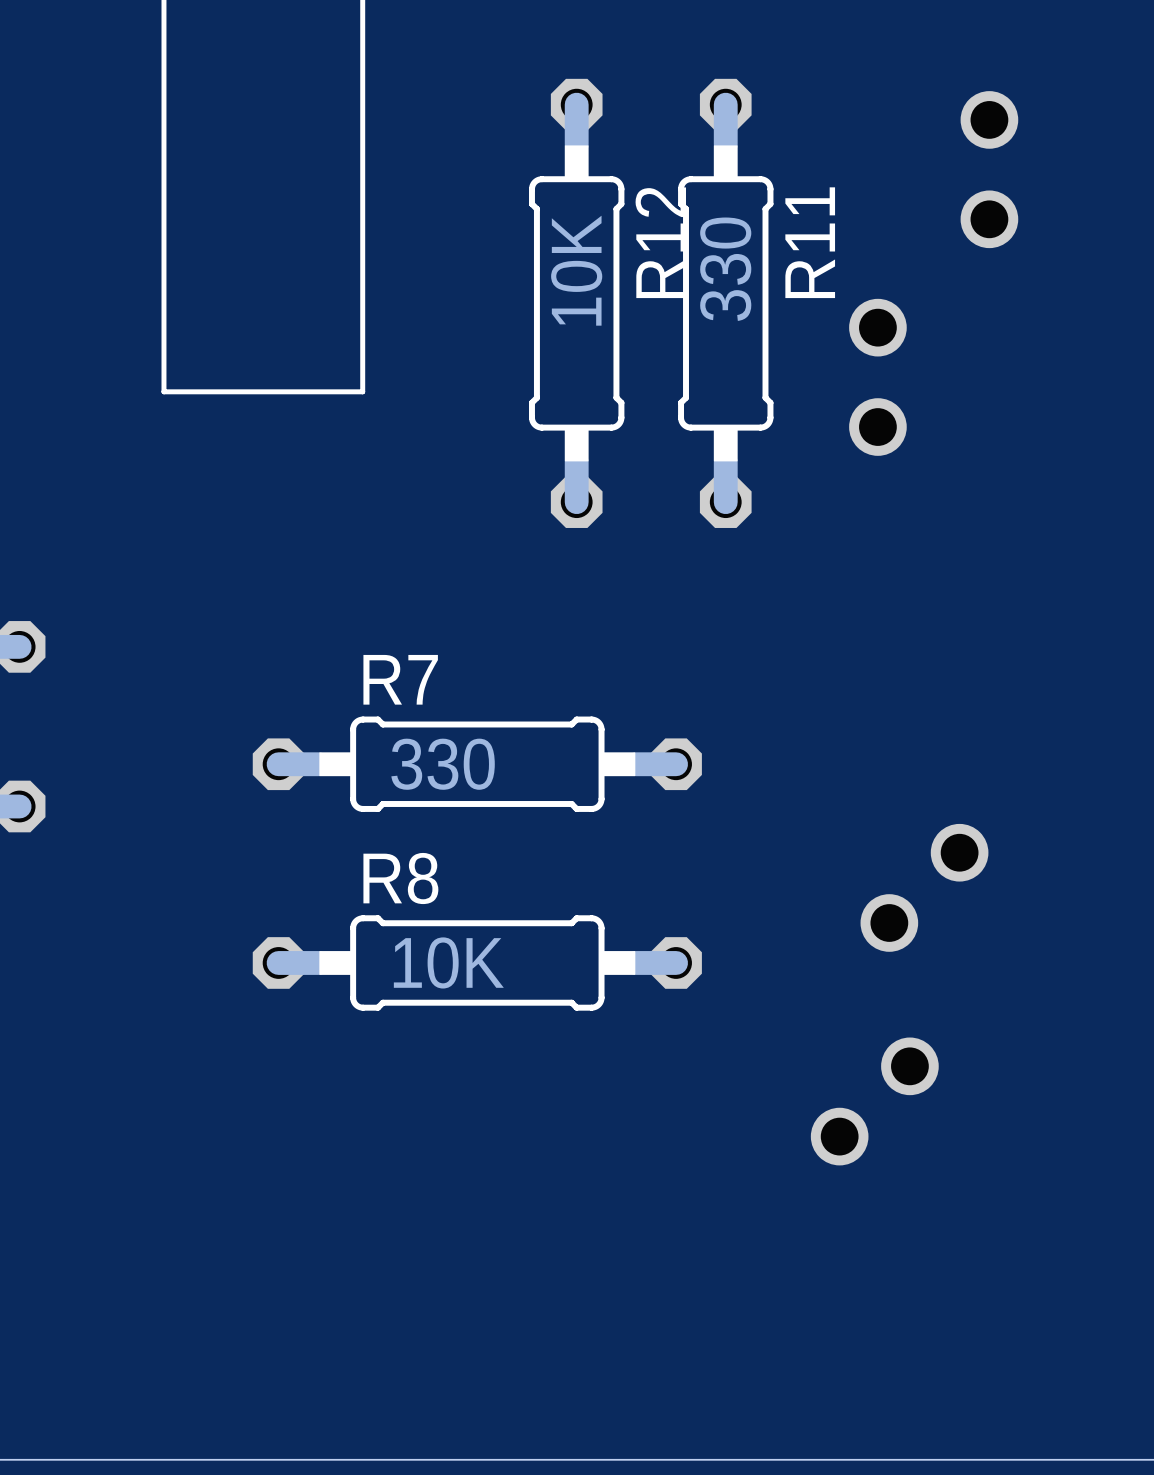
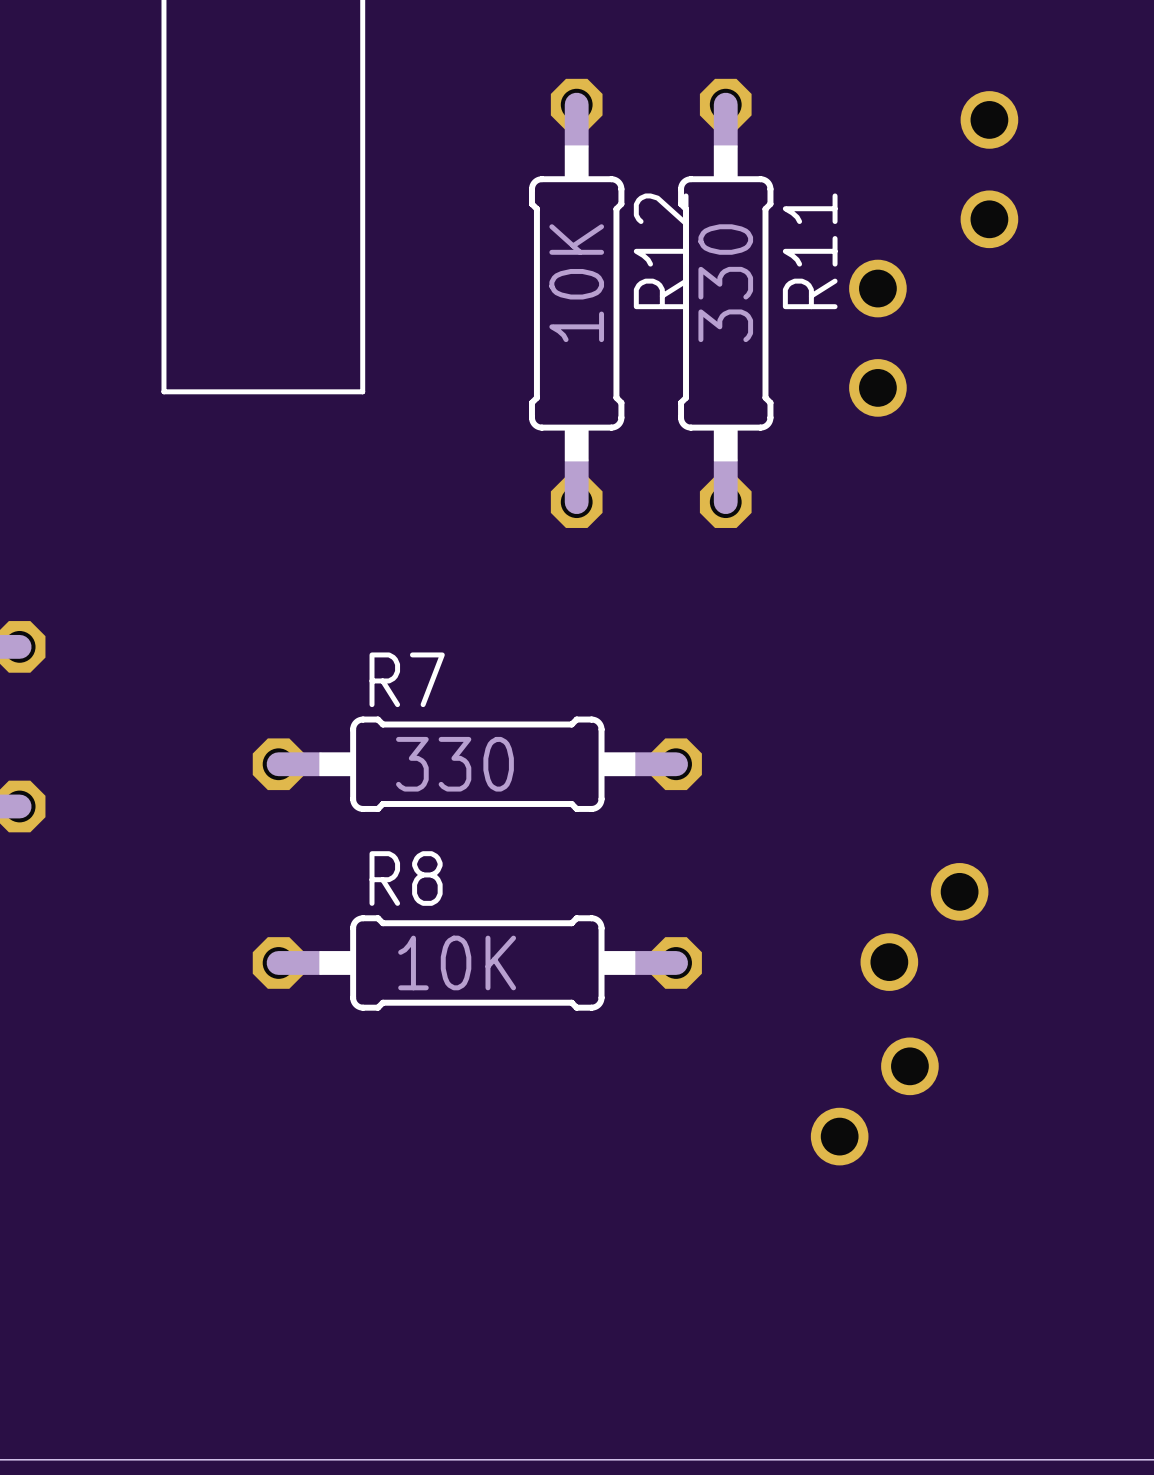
part position: (877, 377) -> (877, 338)
part position: (924, 887) -> (924, 926)

